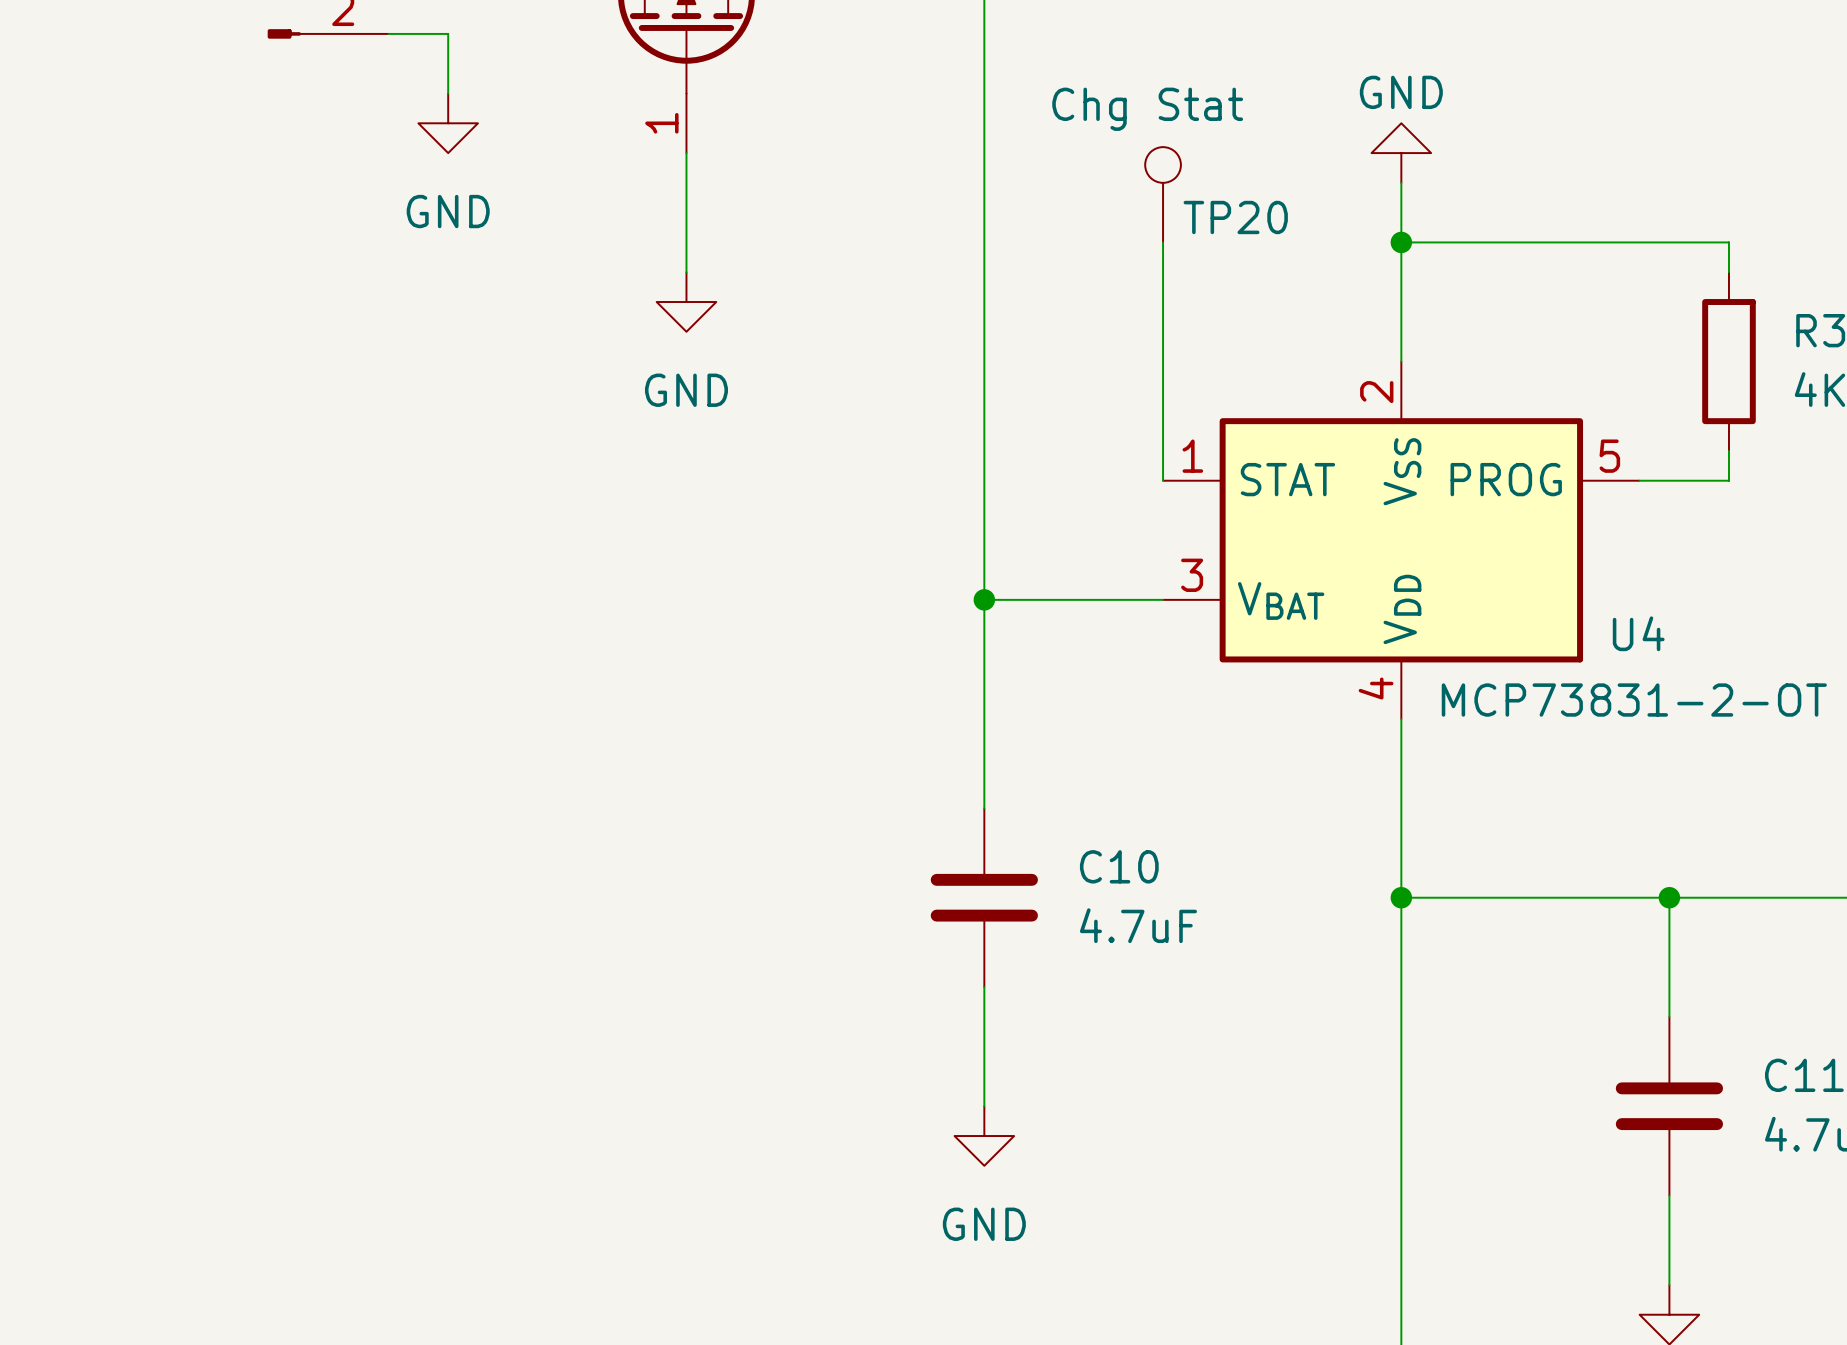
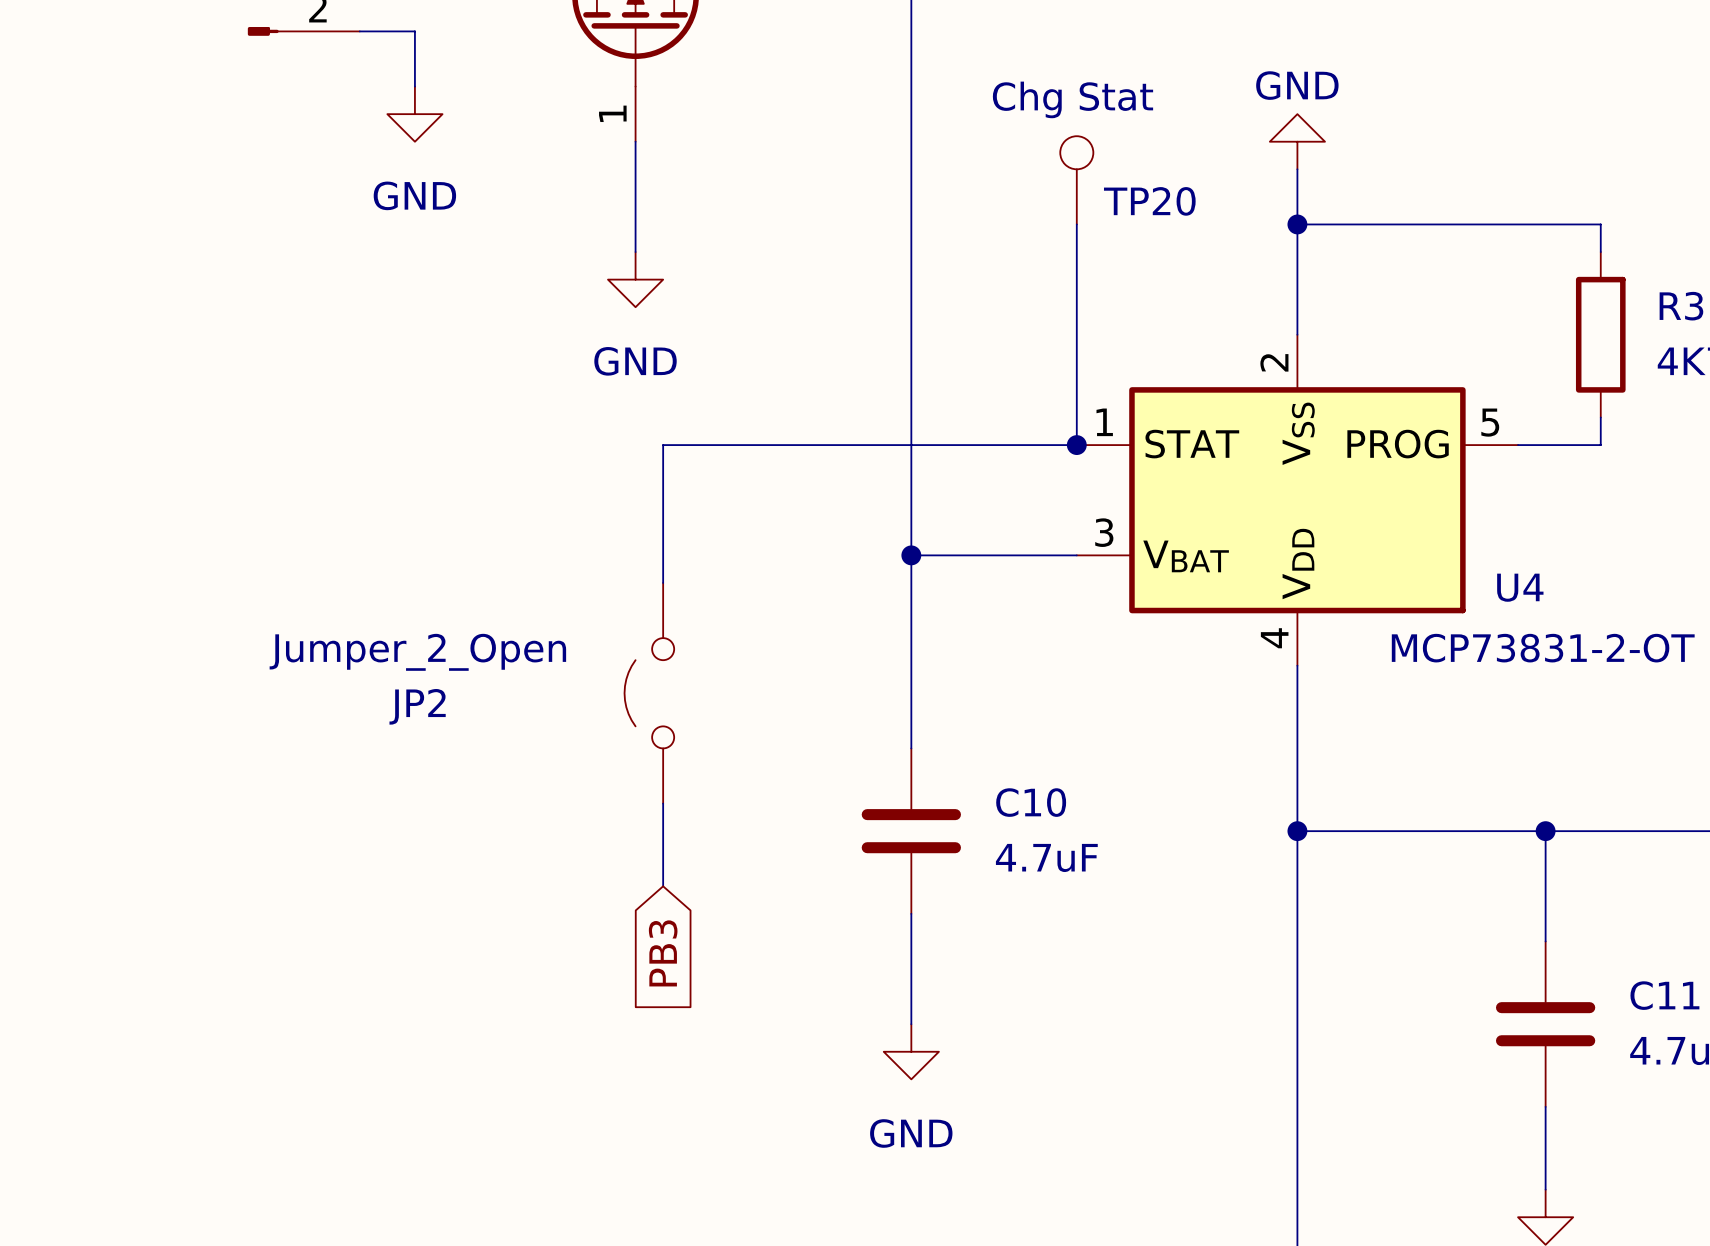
wire: none -> (1076, 445) (663, 445) (663, 582)
junction: none -> (1076, 445)
JP2: none -> Jumper_2_Open (649, 693)
wire: none -> (663, 803) (663, 886)
global label: none -> PB3 (663, 953)

